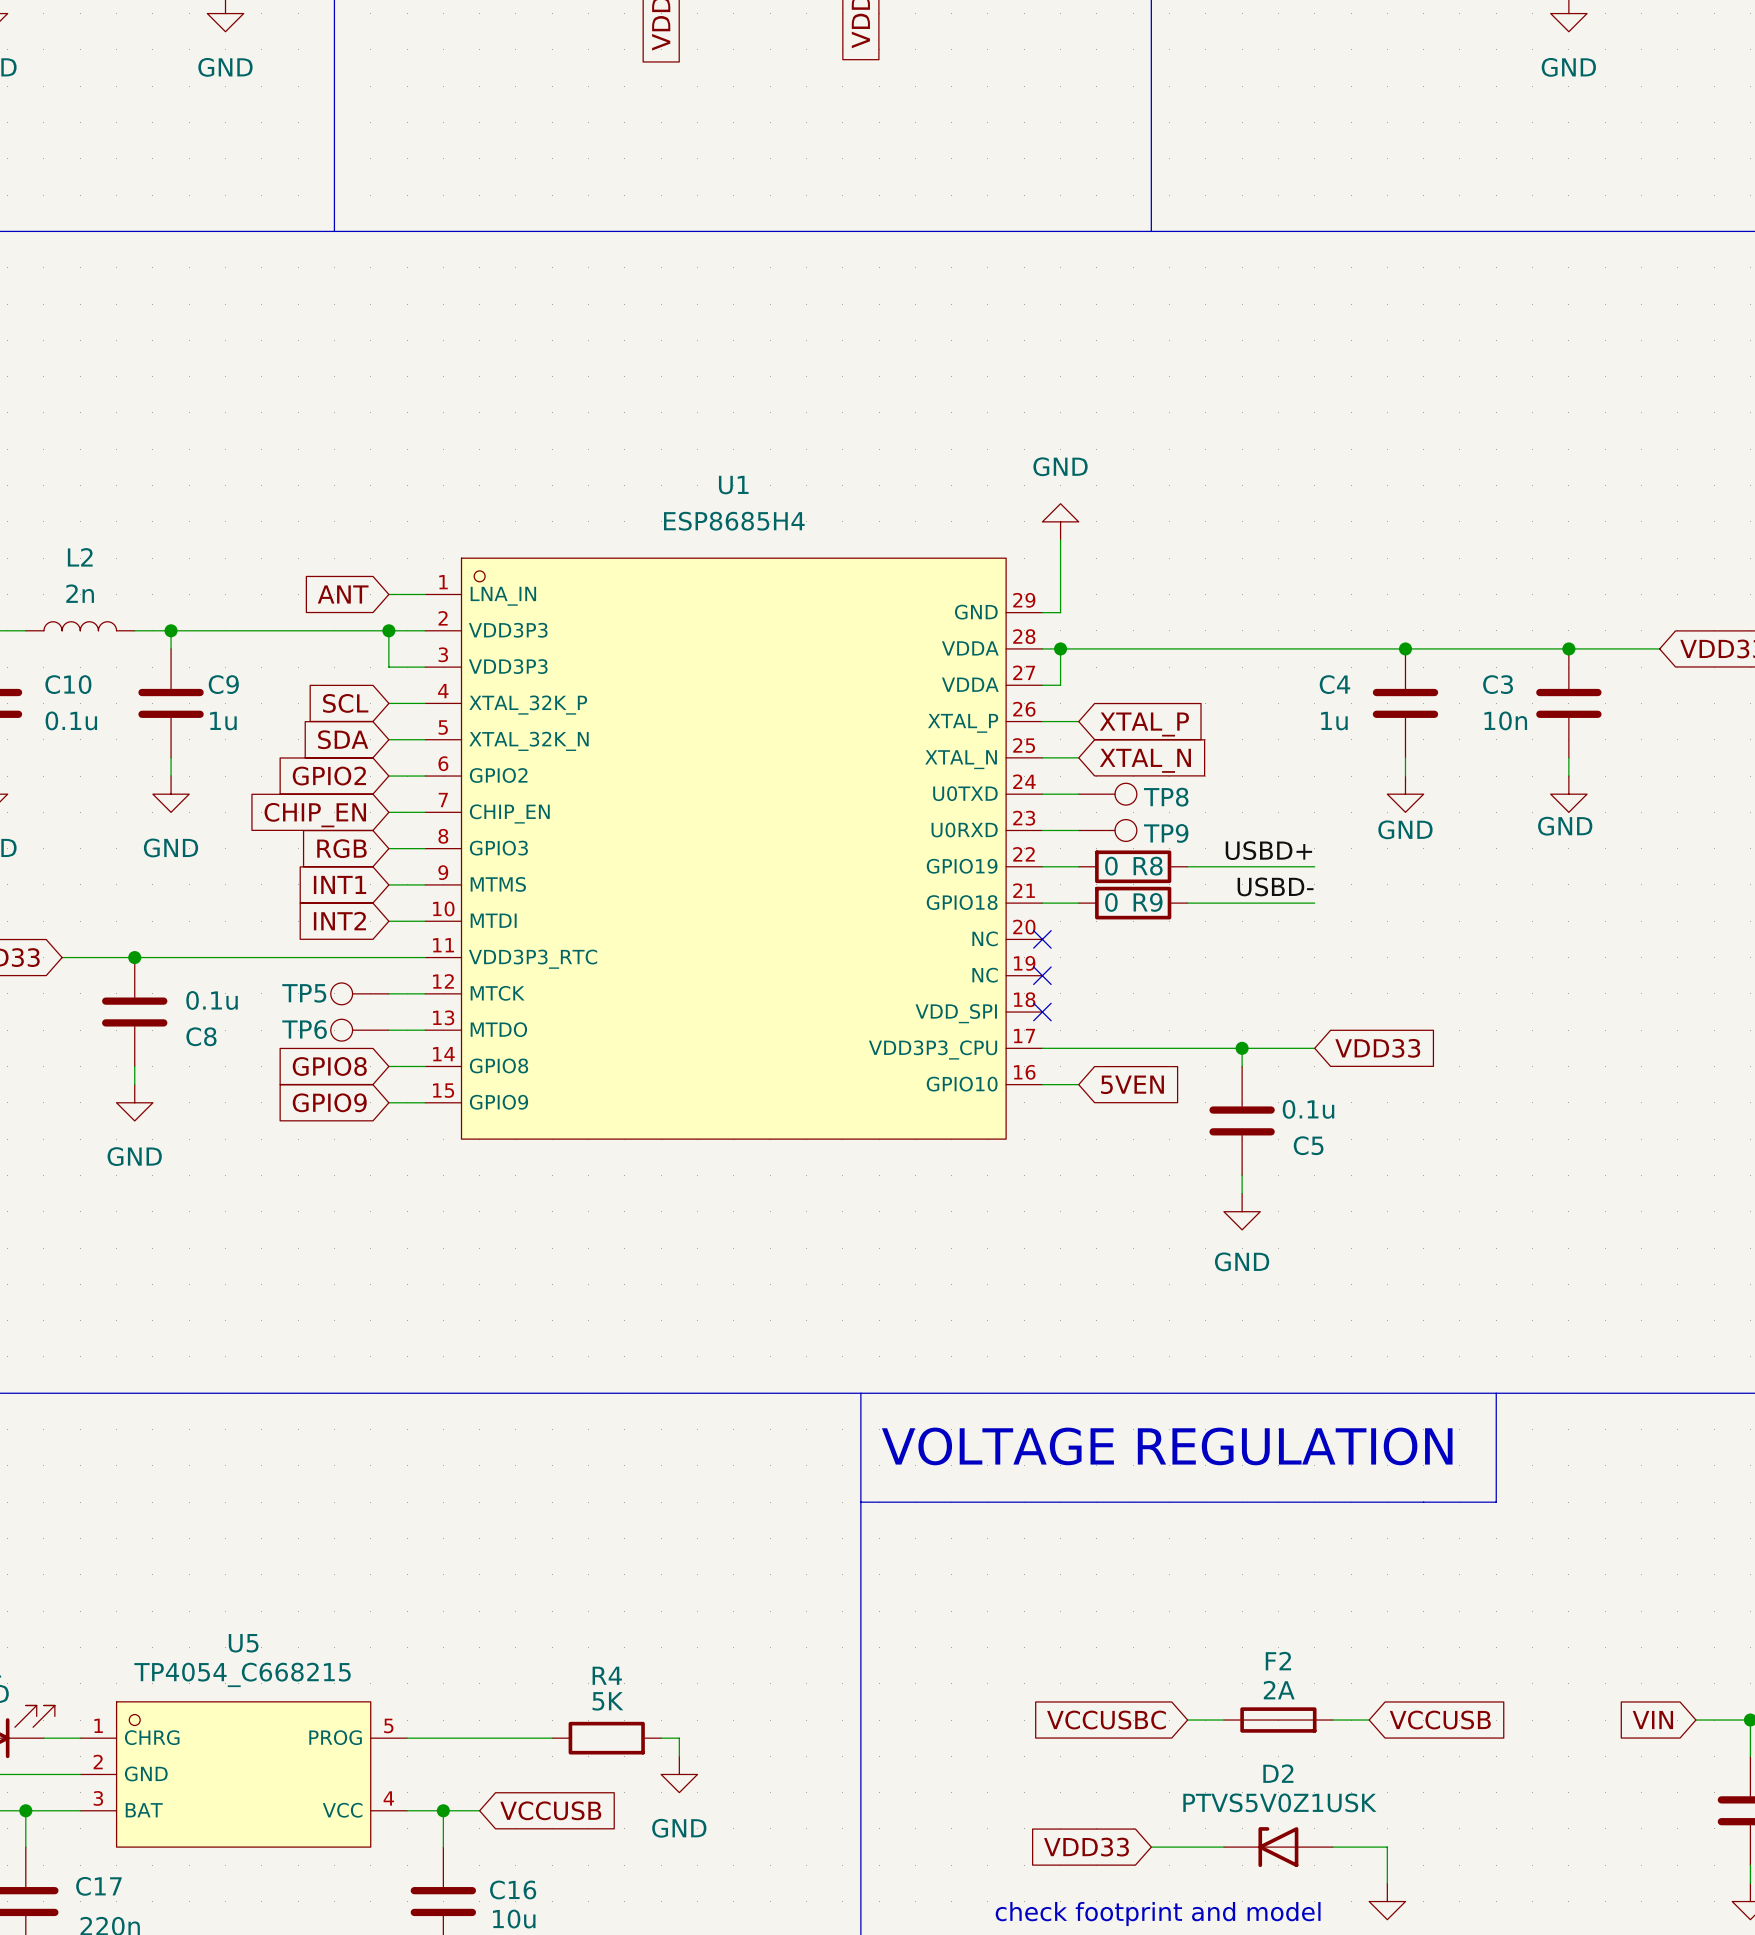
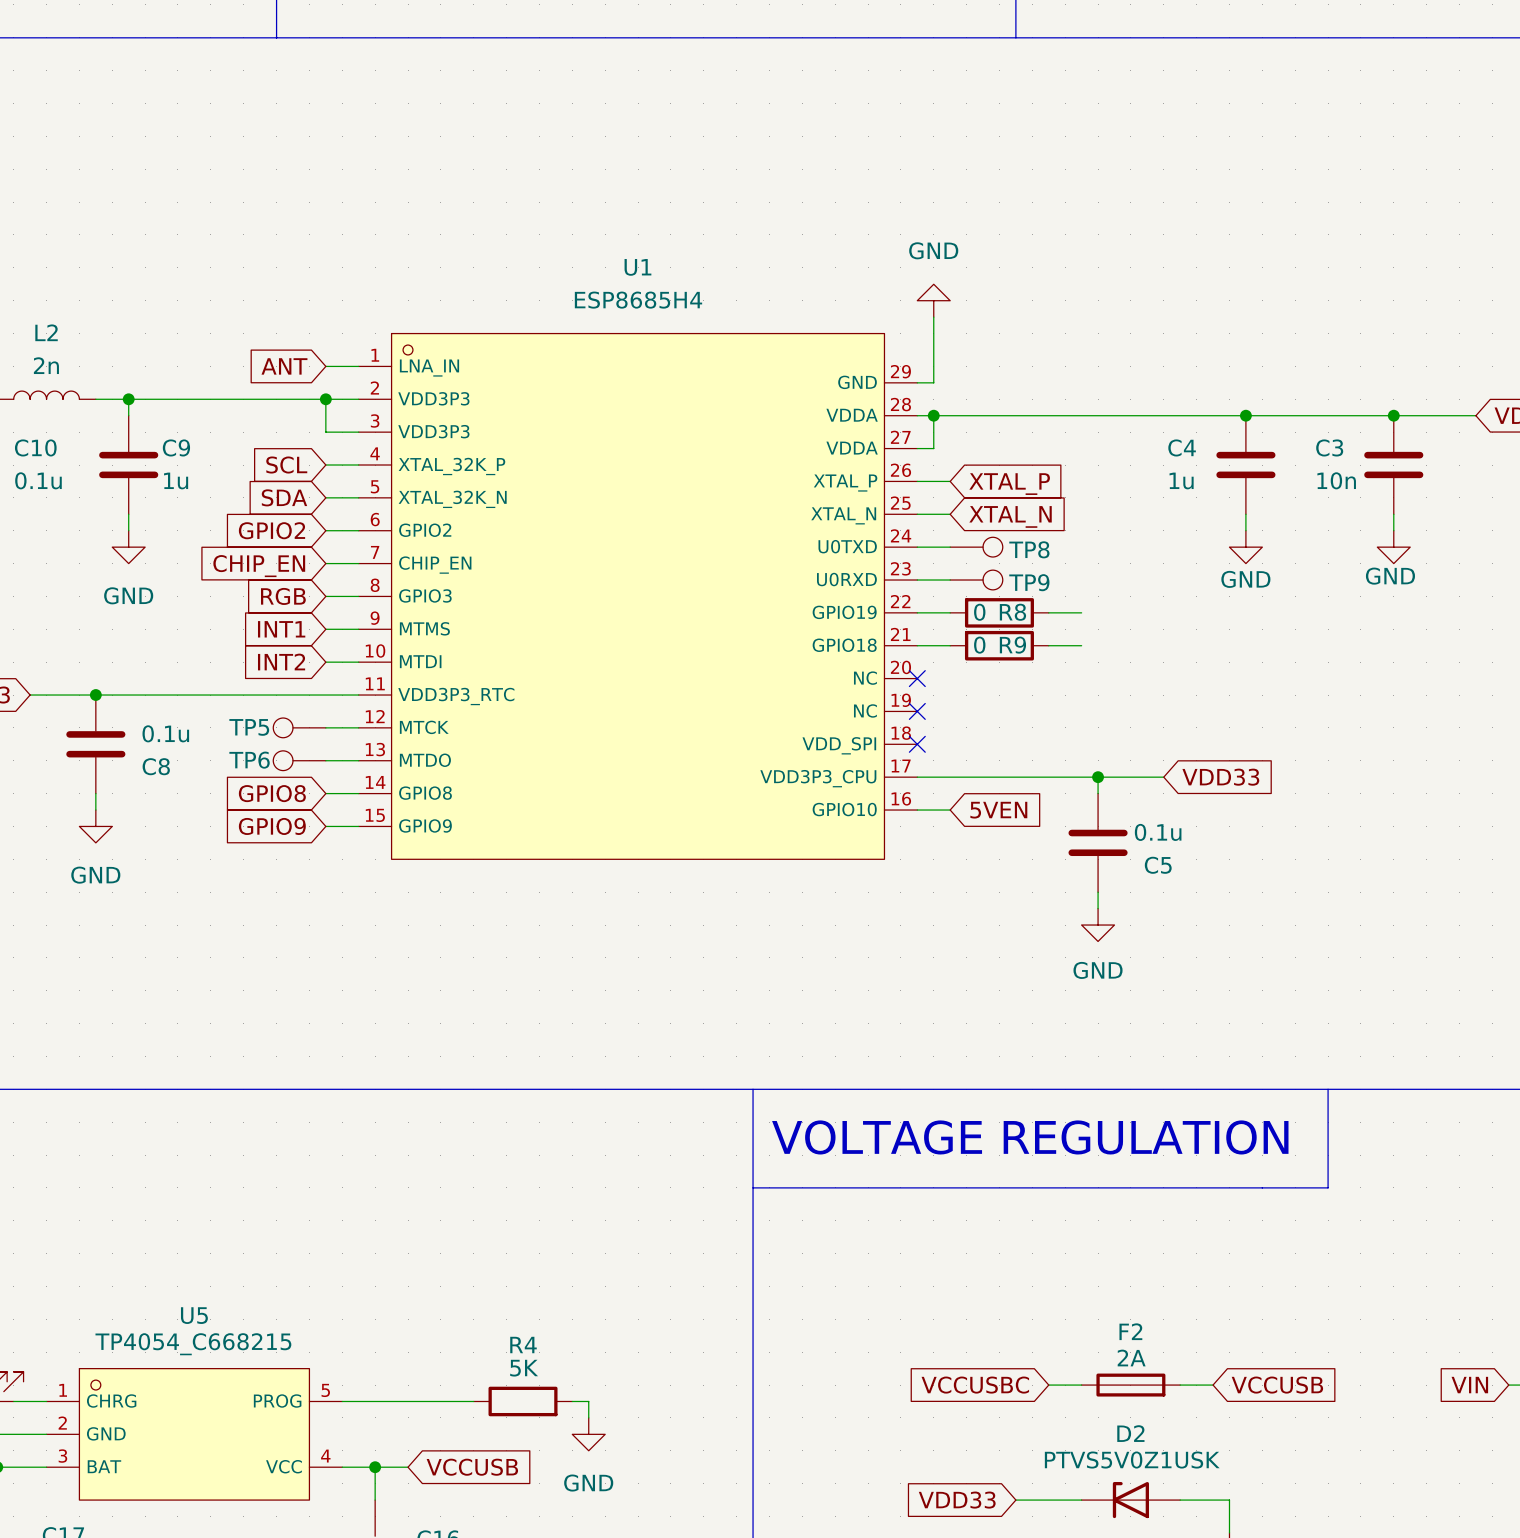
label: USBD+ (1268, 850) -> none
wire: (1223, 866) (1314, 866) -> none
label: USBD- (1275, 886) -> none
wire: (1223, 903) (1314, 903) -> none

